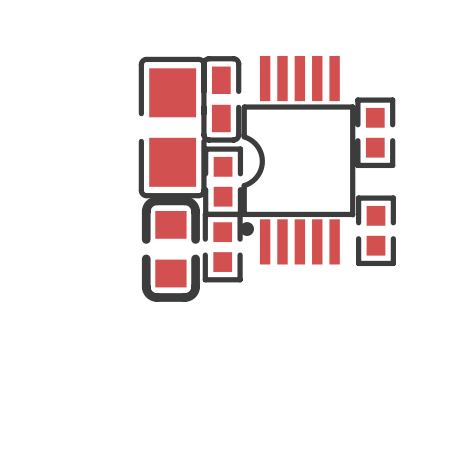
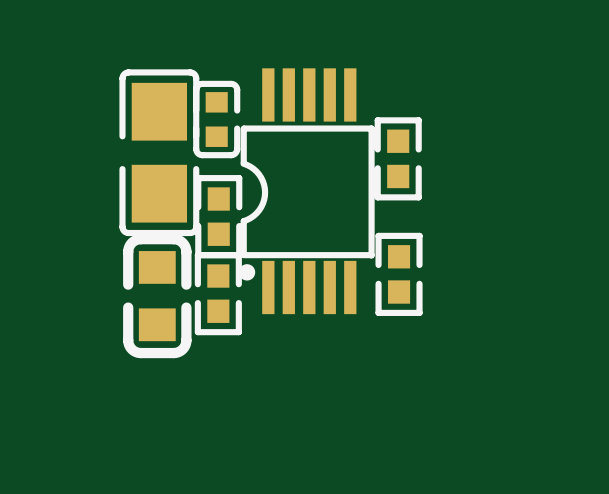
part footprint: [201, 56, 242, 143] -> [193, 80, 241, 159]

